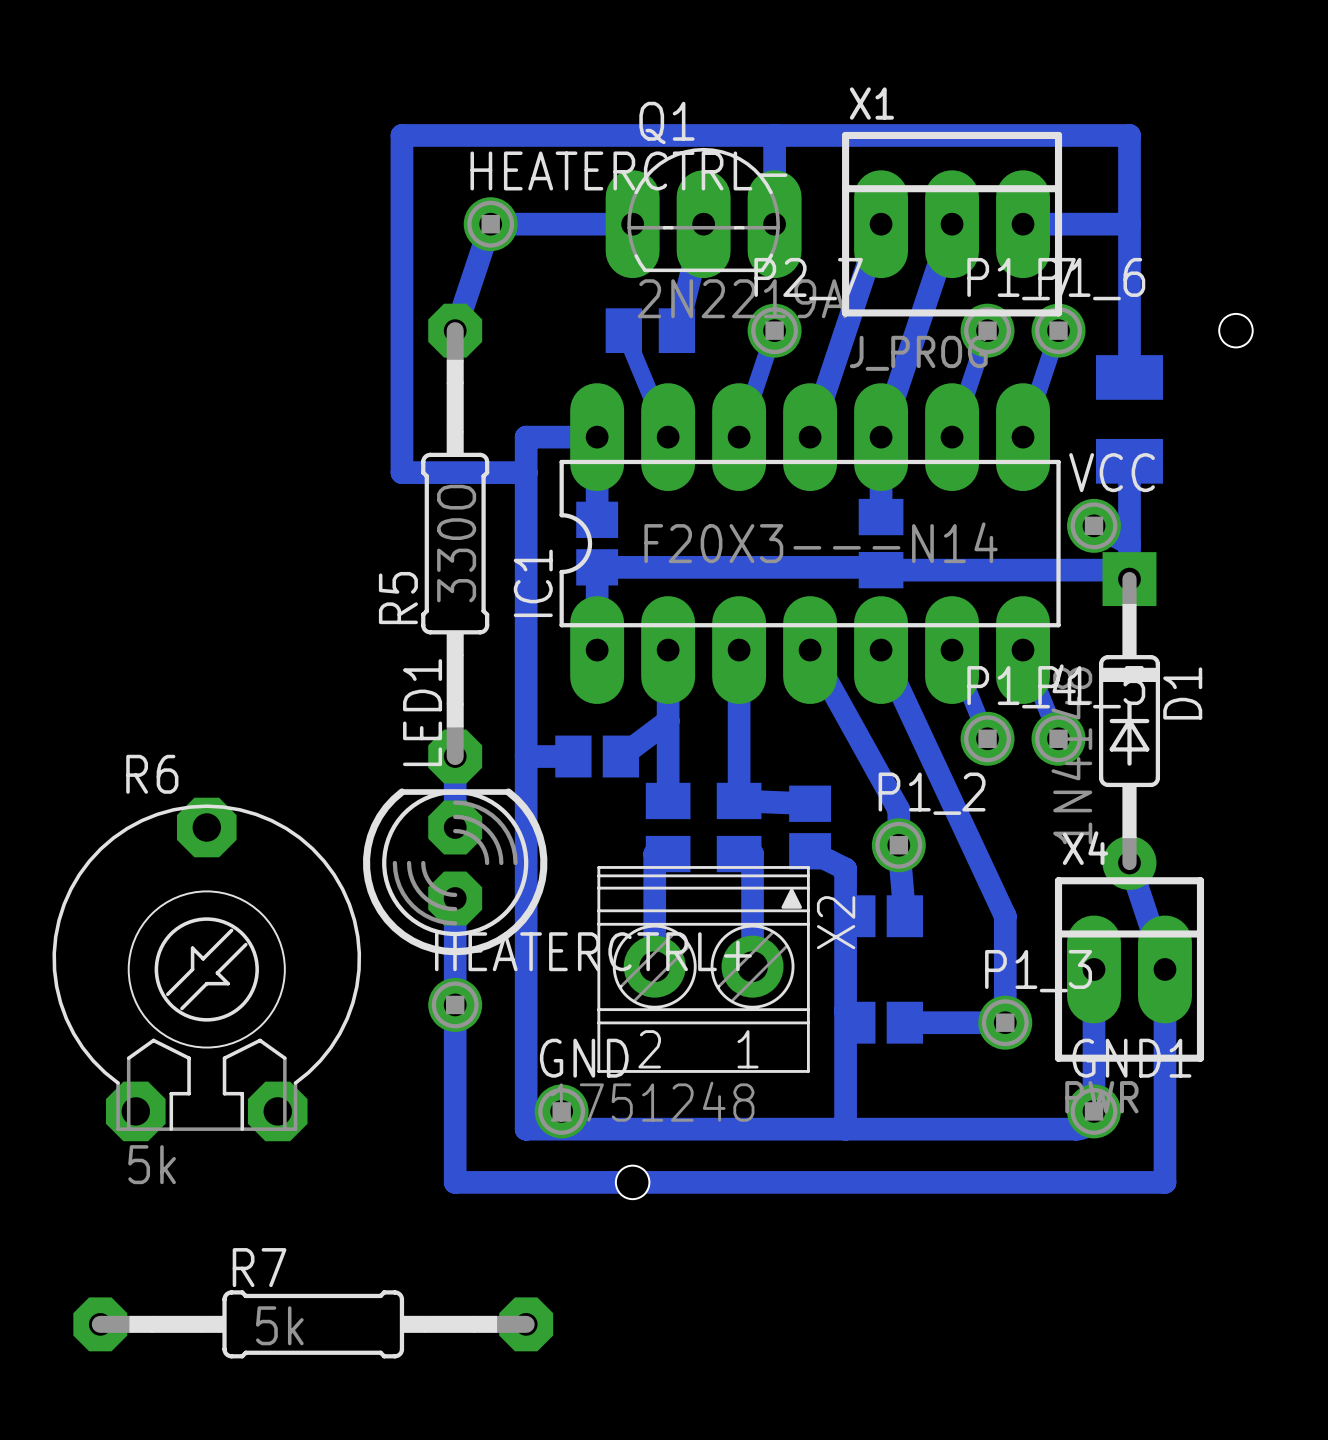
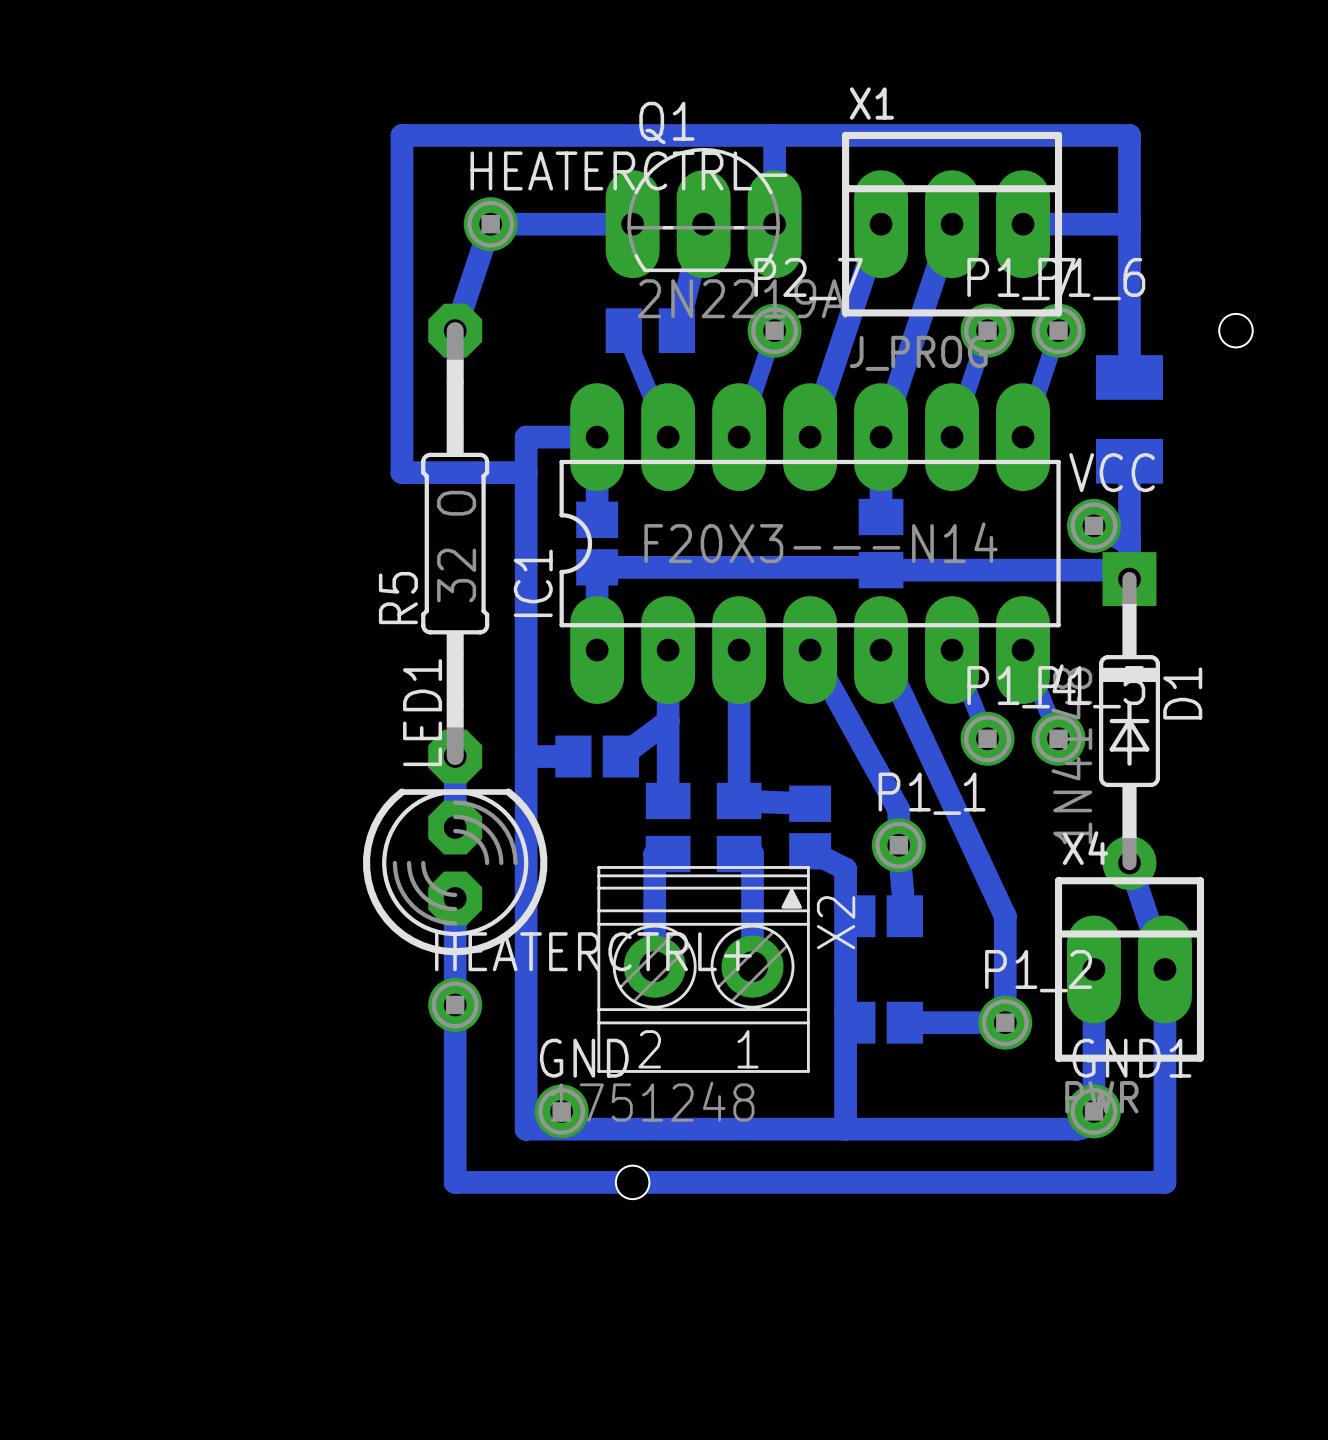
R5 value: 330O (456, 543) -> 32 O (456, 546)
P1_2 name: P1_2 (932, 793) -> P1_1 (932, 793)
R6: 5k (206, 969) -> none
P1_3 name: P1_3 (1038, 971) -> P1_2 (1038, 971)
R7: 5k (313, 1324) -> none

